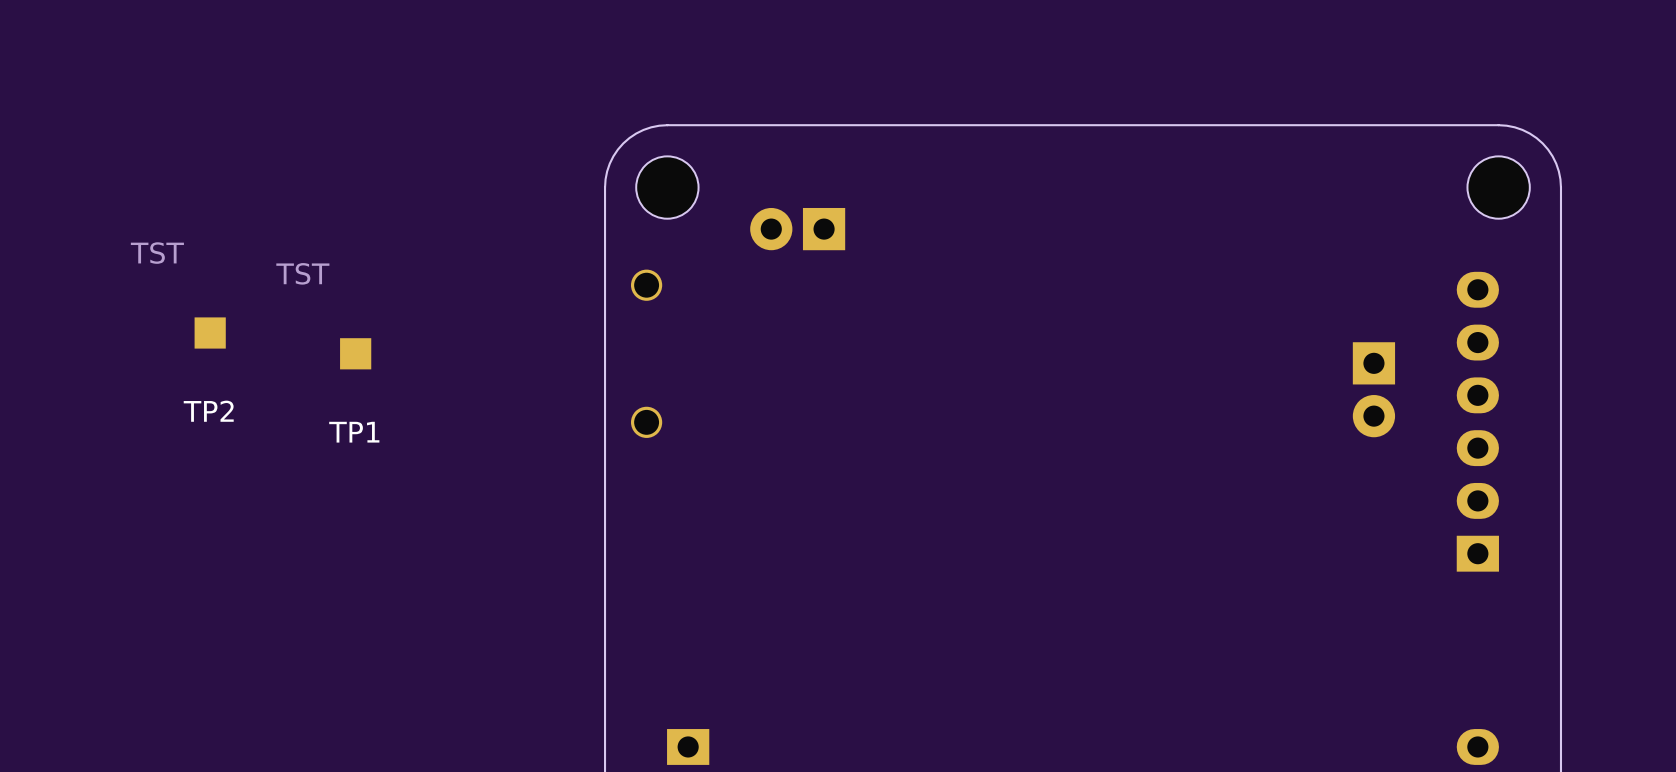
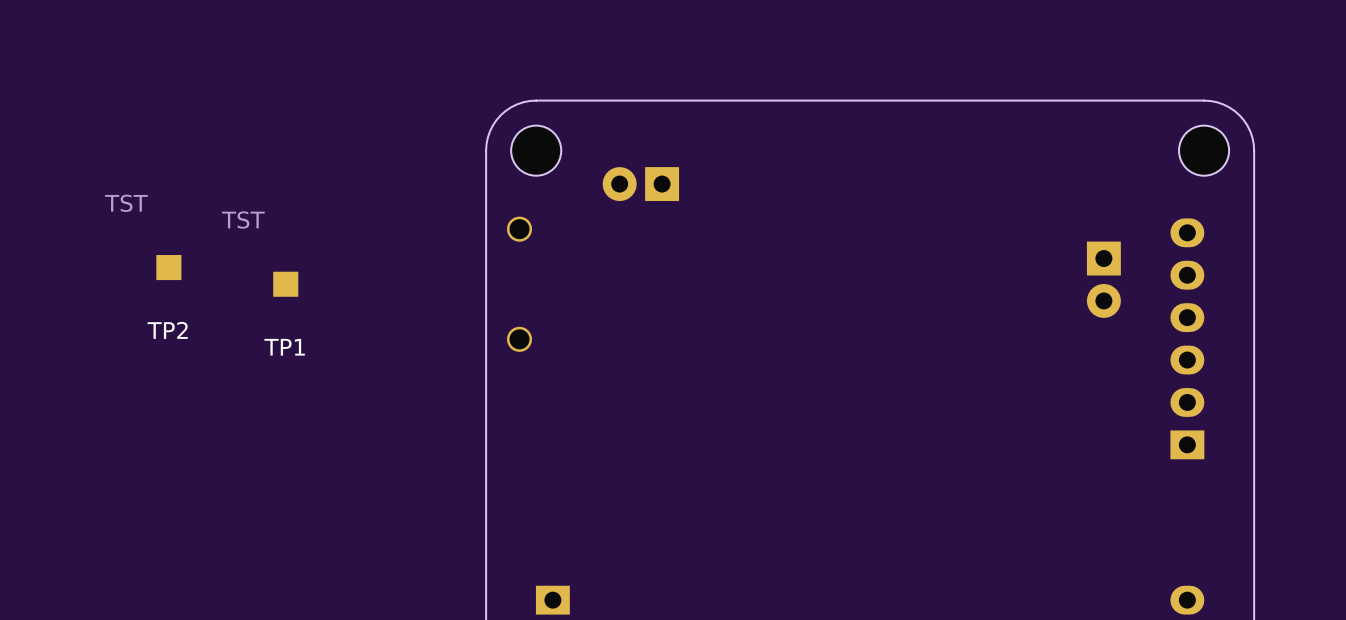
part position: (1373, 389) -> (1103, 279)

